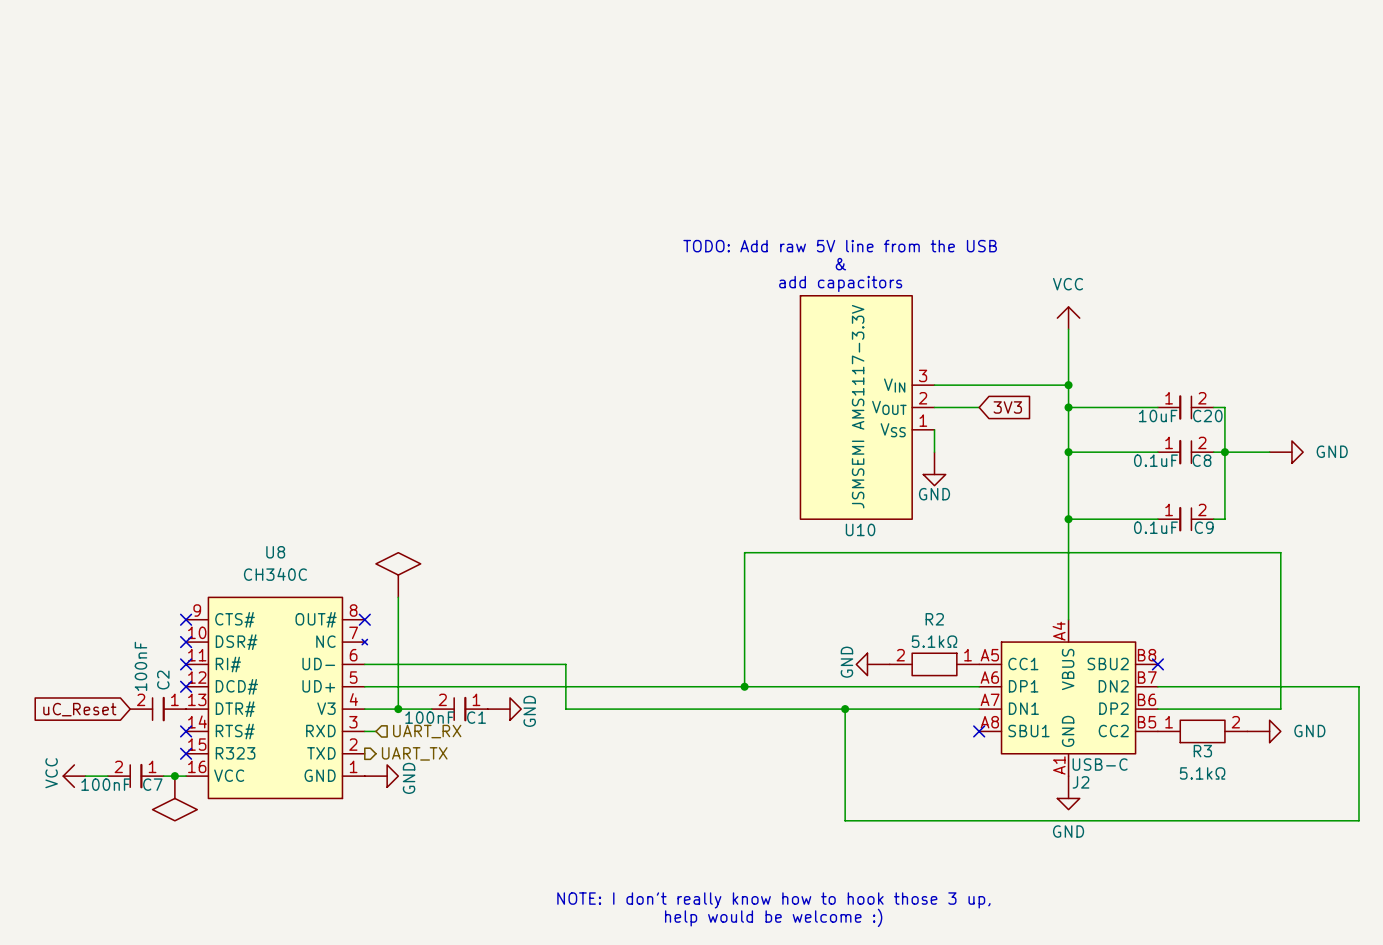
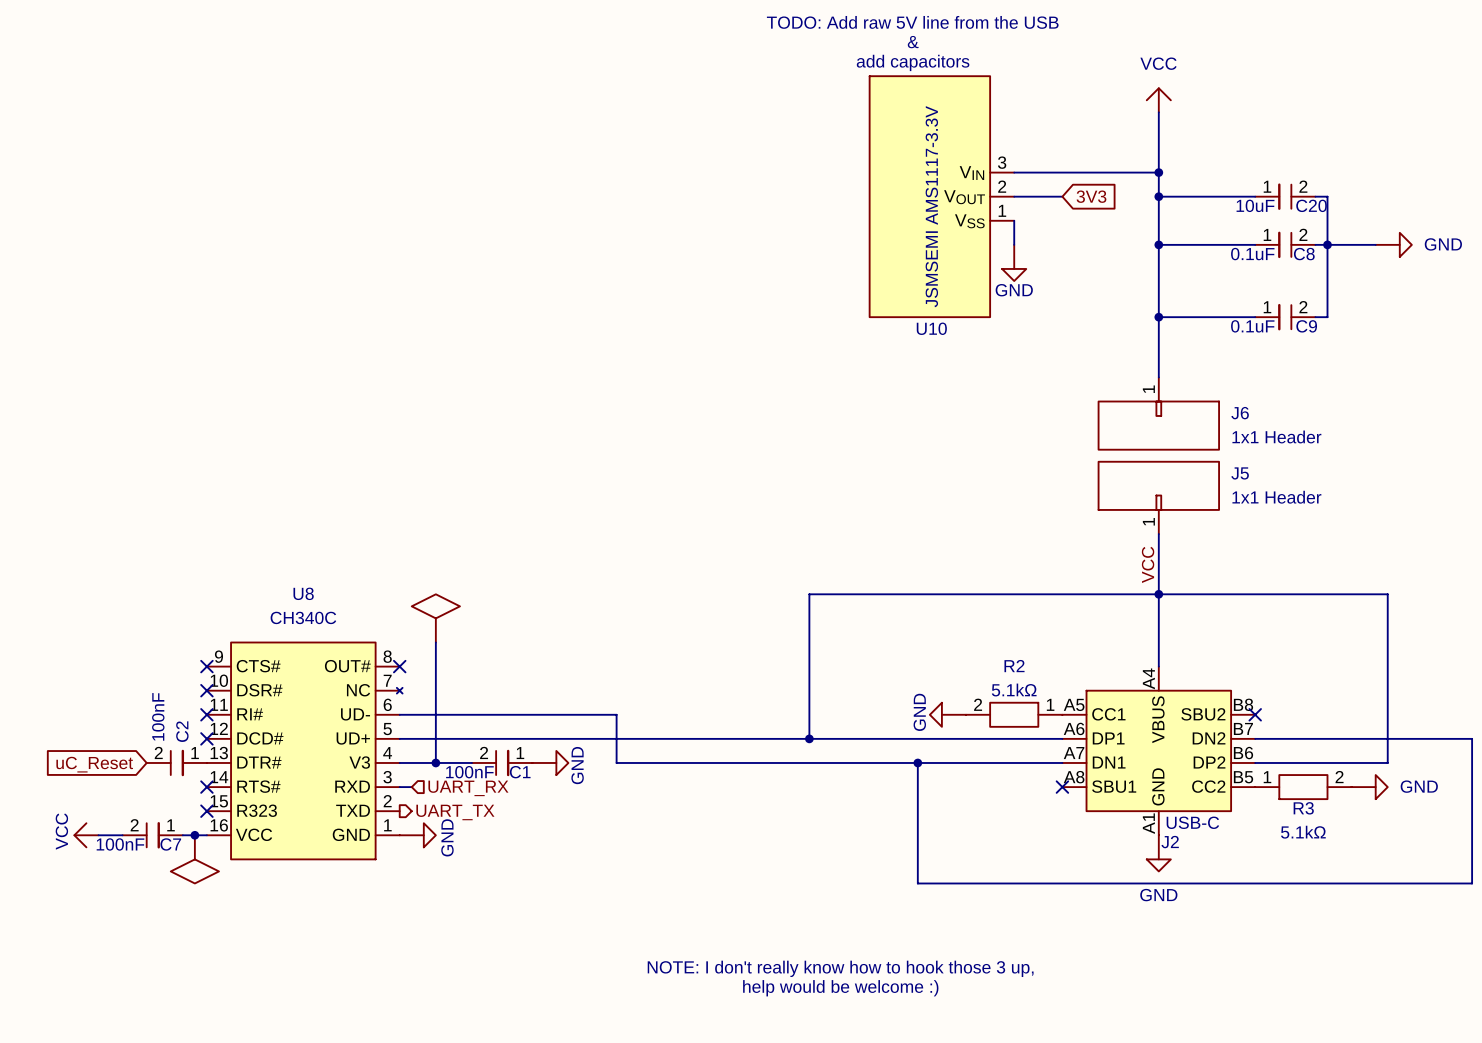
text: none -> TODO: Add raw 5V line from the USB (912, 22)
text: none -> & (913, 42)
text: none -> add capacitors (913, 62)
power symbol: none -> VCC (1158, 100)
wire: none -> (1158, 112) (1158, 353)
wire: none -> (1014, 172) (1158, 172)
junction: none -> (1158, 172)
wire: none -> (1014, 196) (1062, 196)
global label: none -> 3V3 (1091, 196)
wire: none -> (1158, 196) (1255, 196)
junction: none -> (1158, 196)
wire: none -> (1315, 196) (1327, 196) (1327, 317) (1315, 317)
wire: none -> (1014, 220) (1014, 244)
wire: none -> (1158, 244) (1255, 244)
junction: none -> (1158, 244)
wire: none -> (1315, 244) (1375, 244)
junction: none -> (1327, 244)
power symbol: none -> GND (1393, 244)
power symbol: none -> GND (1014, 262)
text: TODO: Add raw 5V line from the USB (840, 246) -> none
text: & (840, 264) -> none
text: add capacitors (840, 283) -> none
junction: none -> (1158, 317)
power symbol: VCC (1068, 318) -> none
wire: (1068, 351) (1068, 496) -> none
wire: (934, 385) (1068, 385) -> none
junction: (1068, 385) -> none
J6: none -> 1x1 Header (1158, 413)
U10 position: (867, 407) -> (941, 196)
wire: (934, 407) (979, 407) -> none
global label: 3V3 (1007, 407) -> none
wire: (1068, 407) (1157, 407) -> (1158, 317) (1255, 317)
junction: (1068, 407) -> none
C20 position: (1185, 407) -> (1285, 196)
wire: (1213, 407) (1224, 407) (1224, 519) (1213, 519) -> none
wire: (934, 429) (934, 452) -> none
wire: (1068, 452) (1157, 452) -> none
junction: (1068, 452) -> none
C8 position: (1185, 452) -> (1285, 244)
wire: (1213, 452) (1269, 452) -> none
junction: (1224, 452) -> none
power symbol: GND (1286, 452) -> none
J5: none -> 1x1 Header (1158, 497)
power symbol: GND (934, 468) -> none
wire: (1068, 519) (1157, 519) -> none
junction position: (1068, 519) -> (1158, 594)
C9 position: (1185, 519) -> (1285, 317)
label: none -> VCC (1148, 564)

